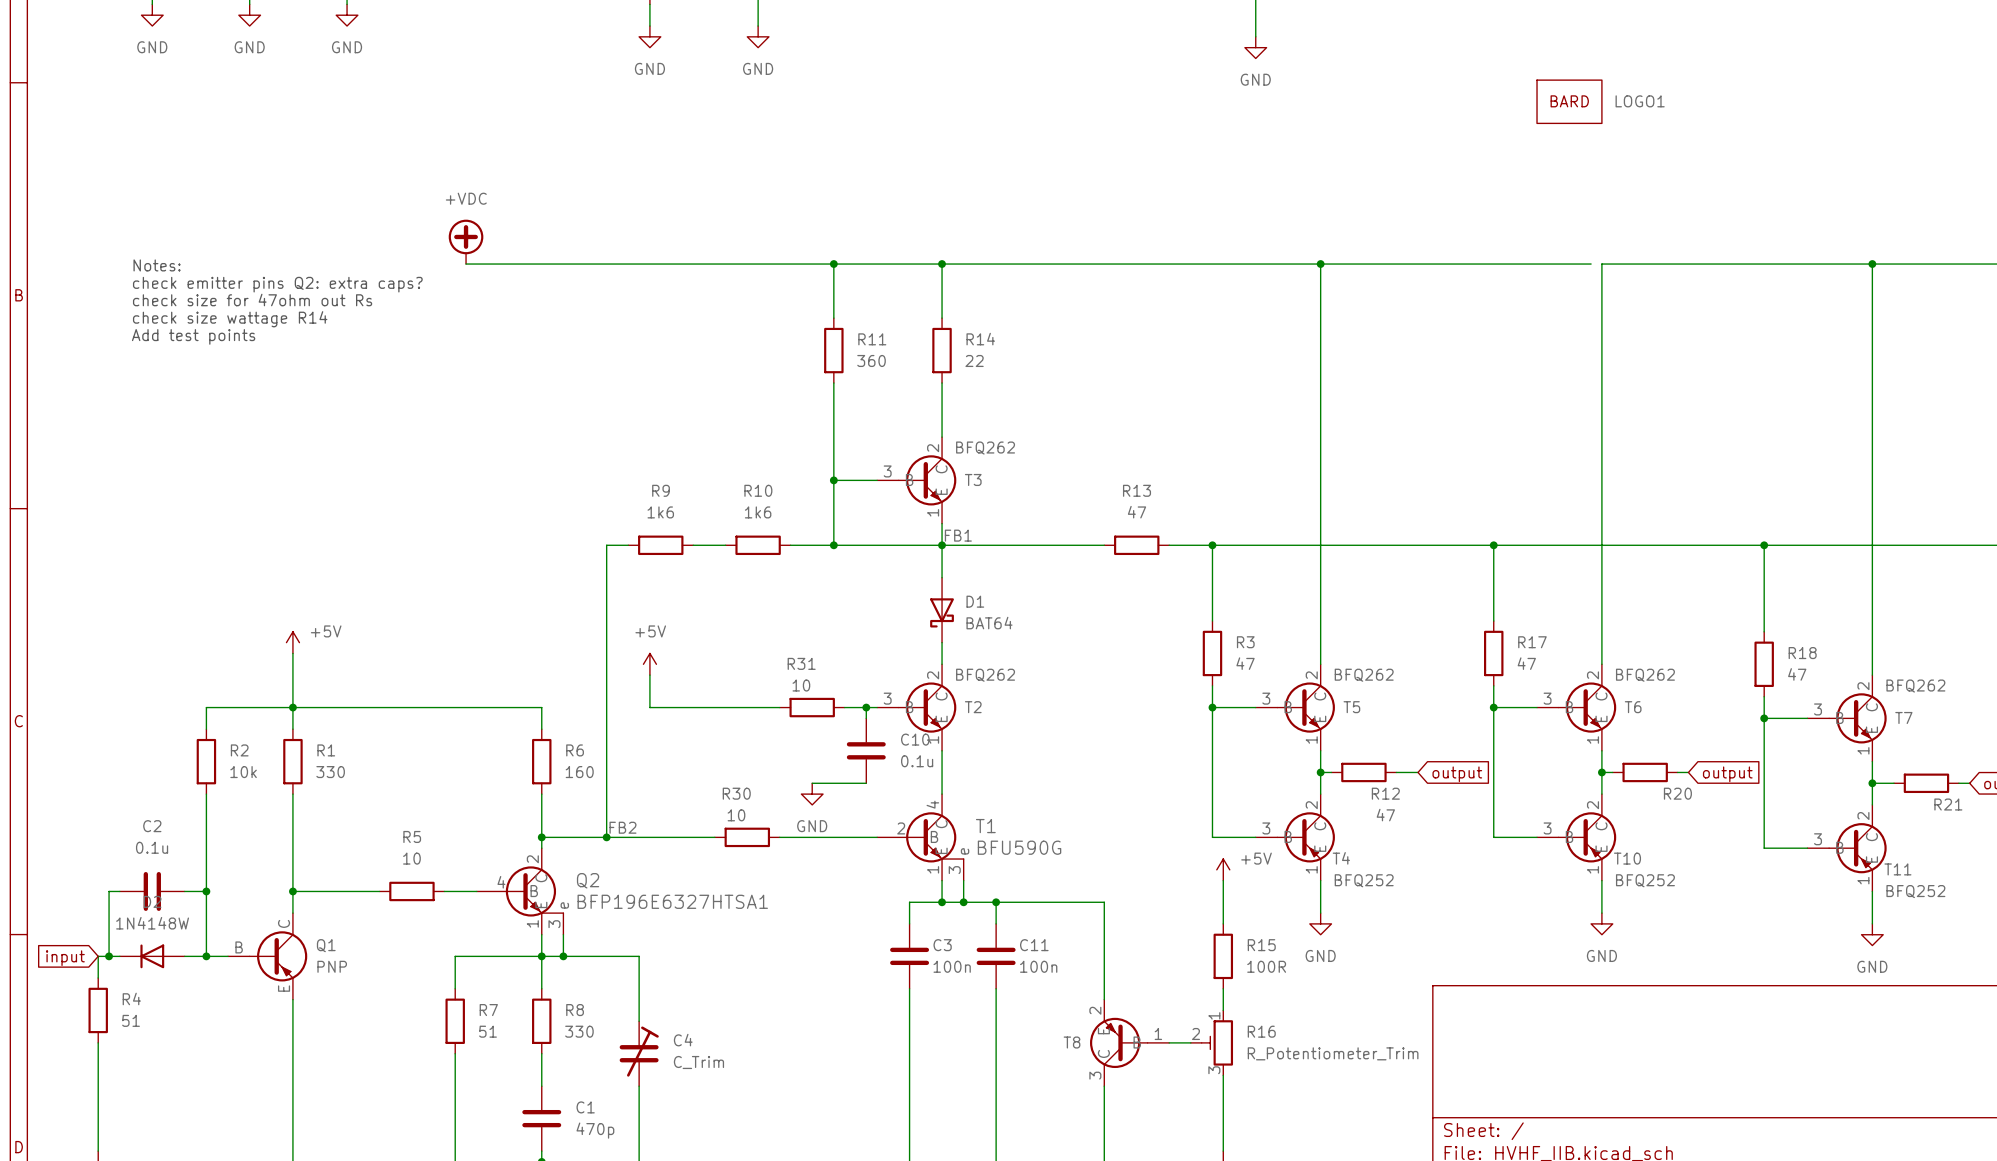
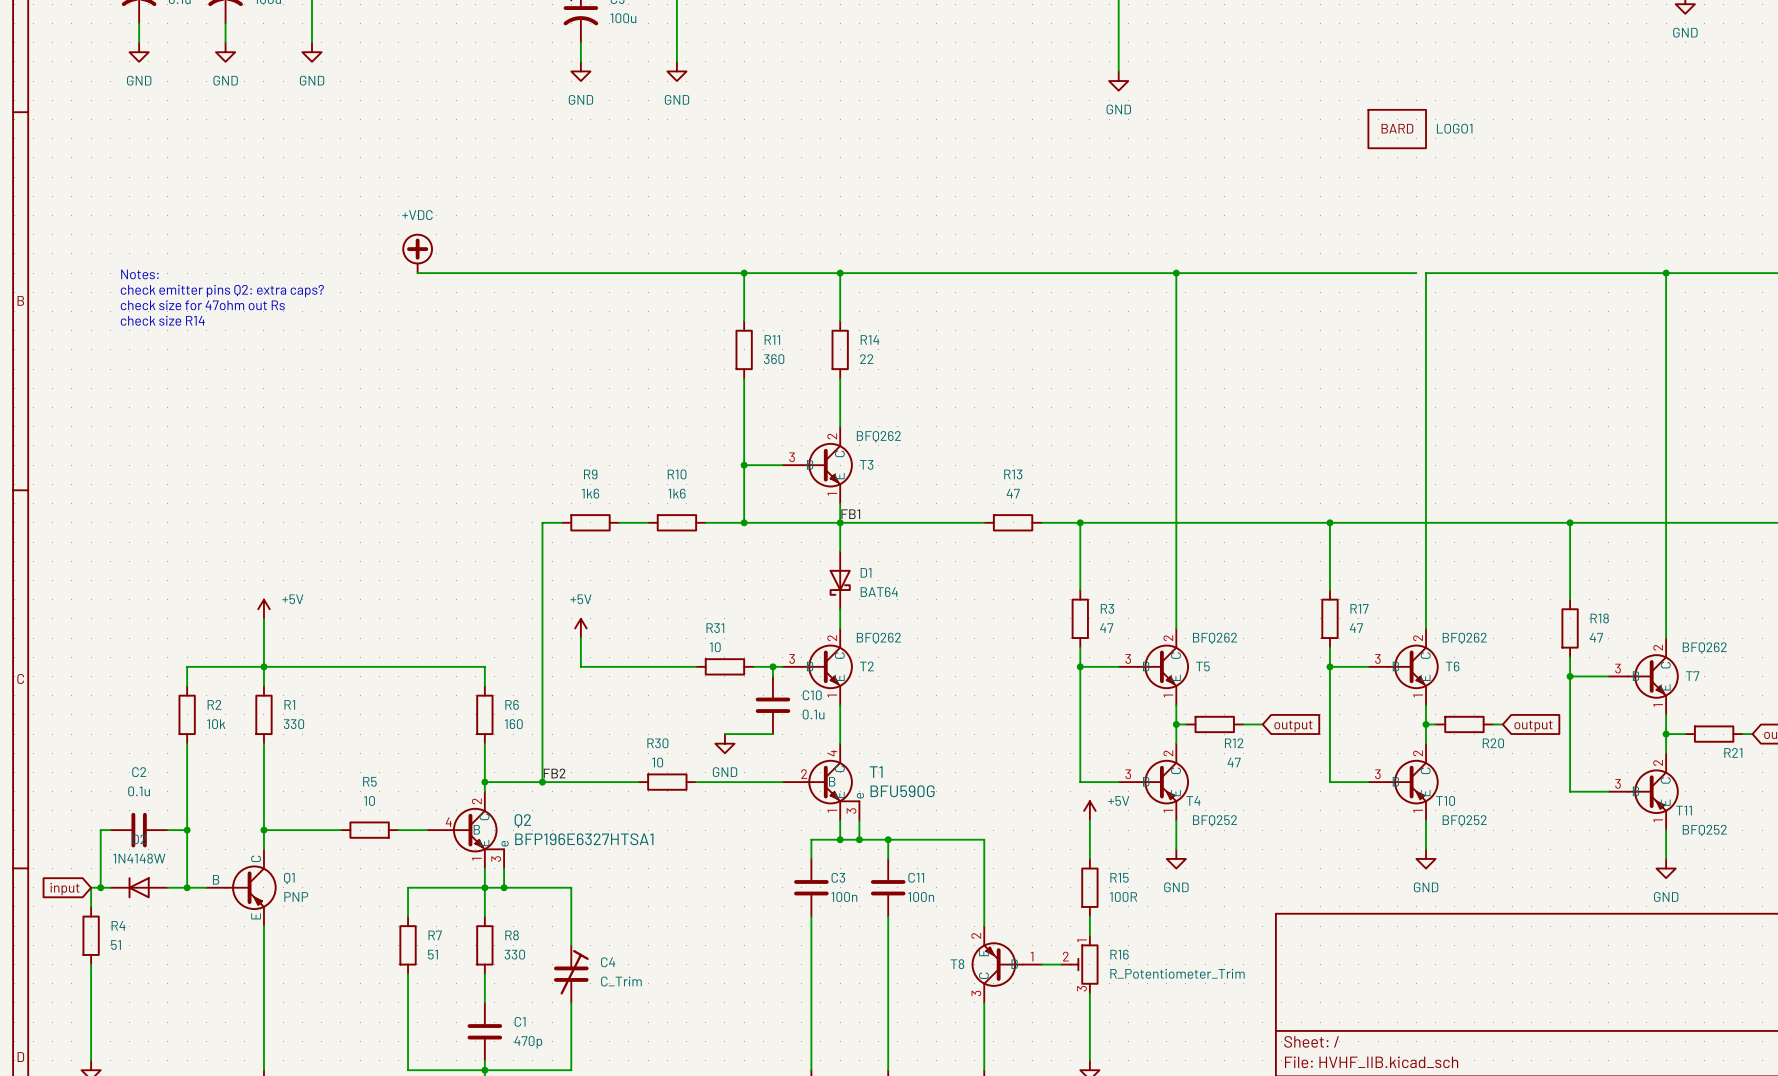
text: check size wattage R14 (230, 319) -> check size R14 (162, 320)
text: Add test points (193, 336) -> none

